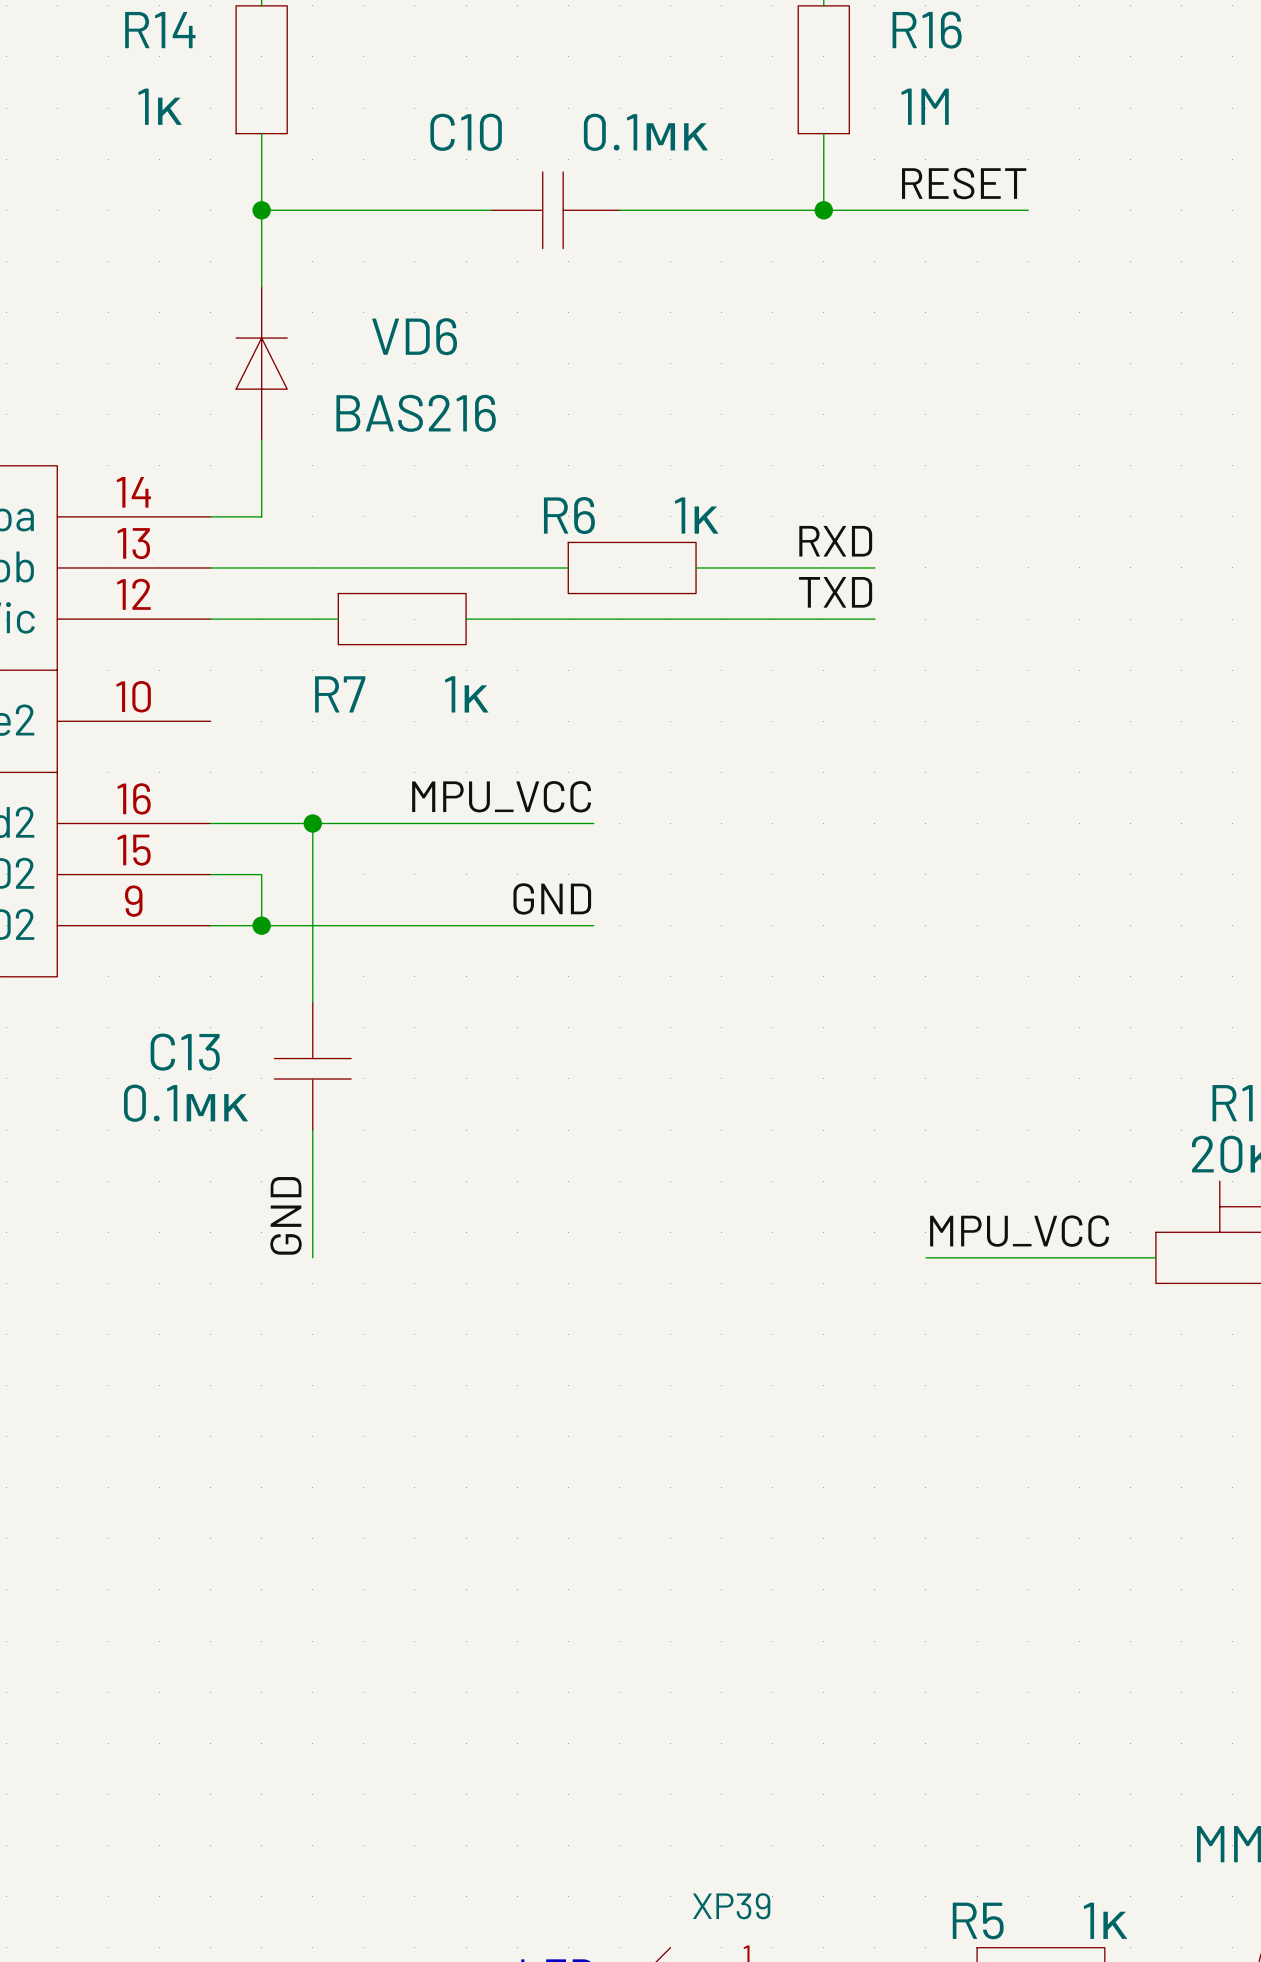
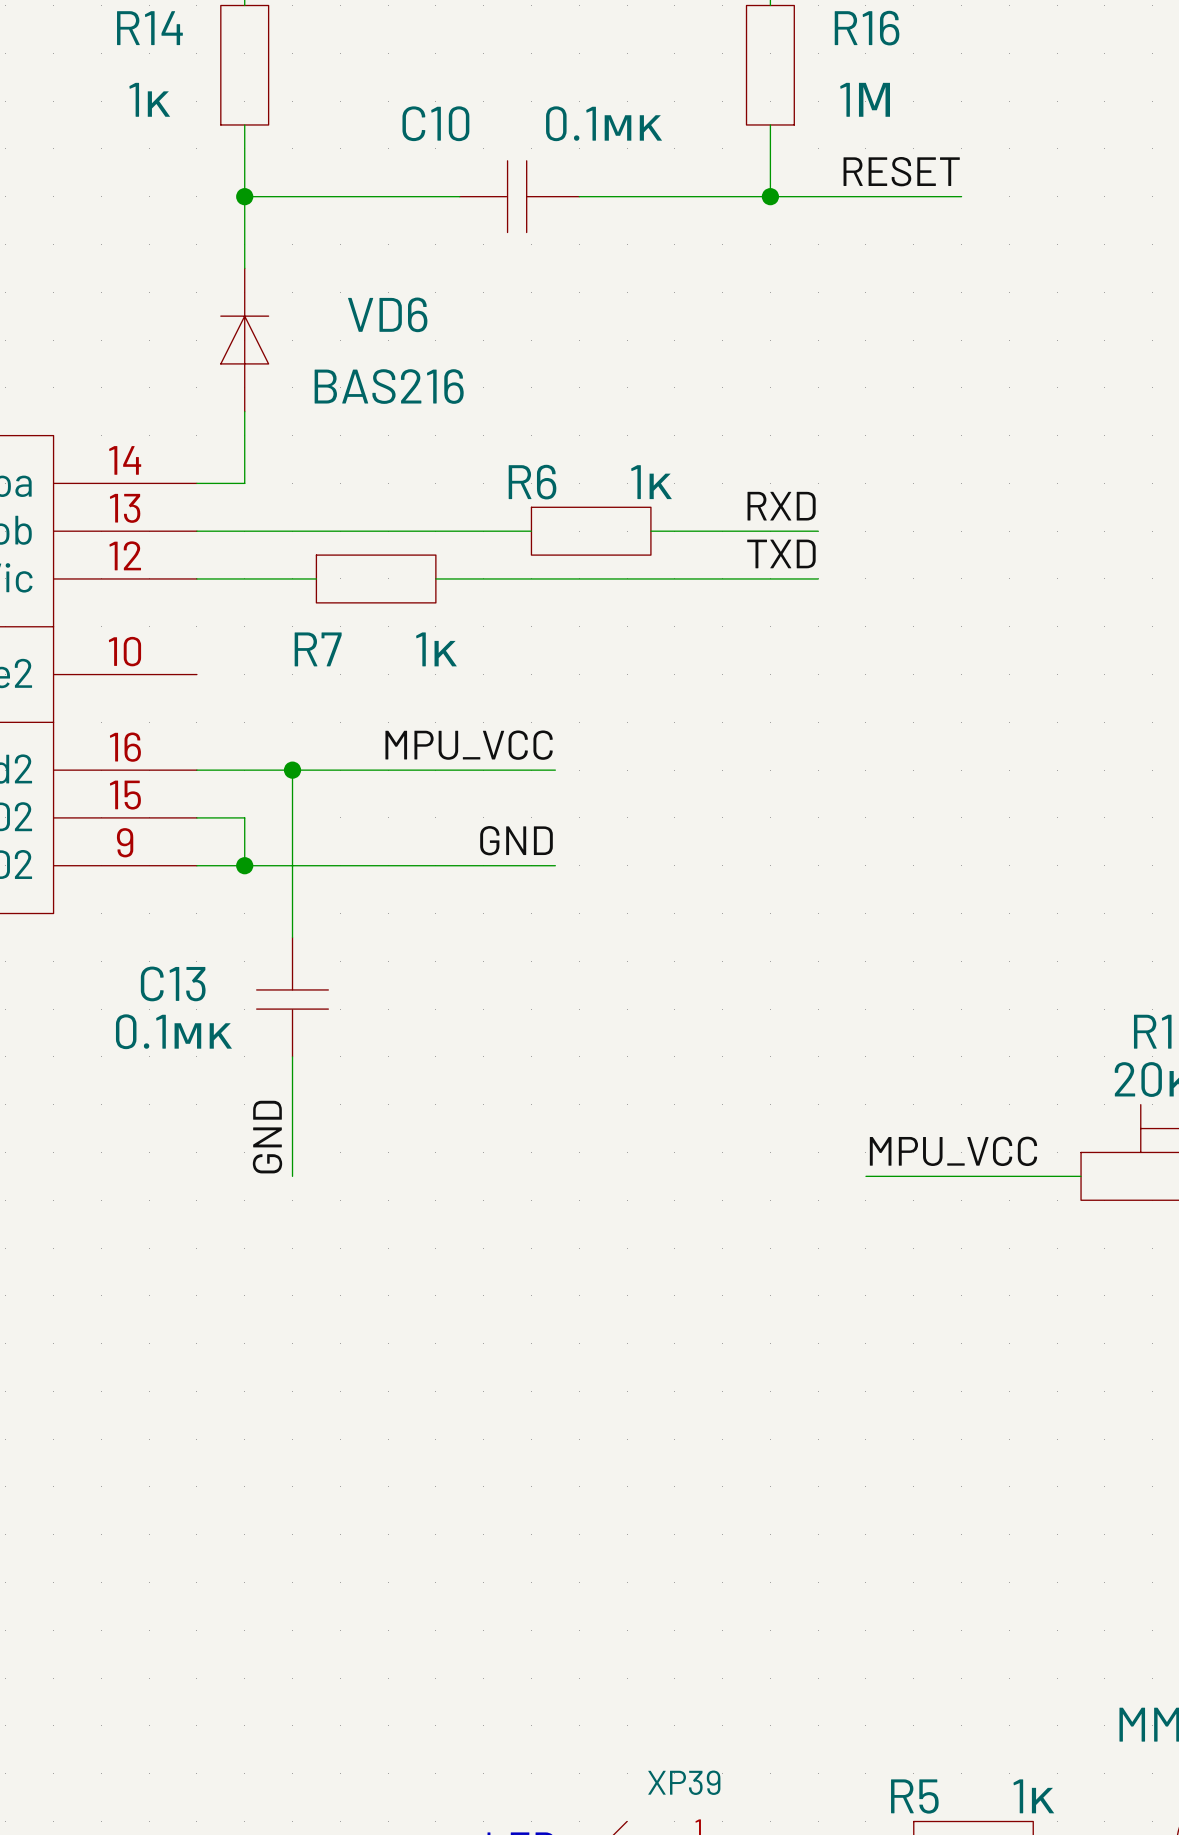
R16 value: 1M (925, 106) -> 1М (865, 99)

